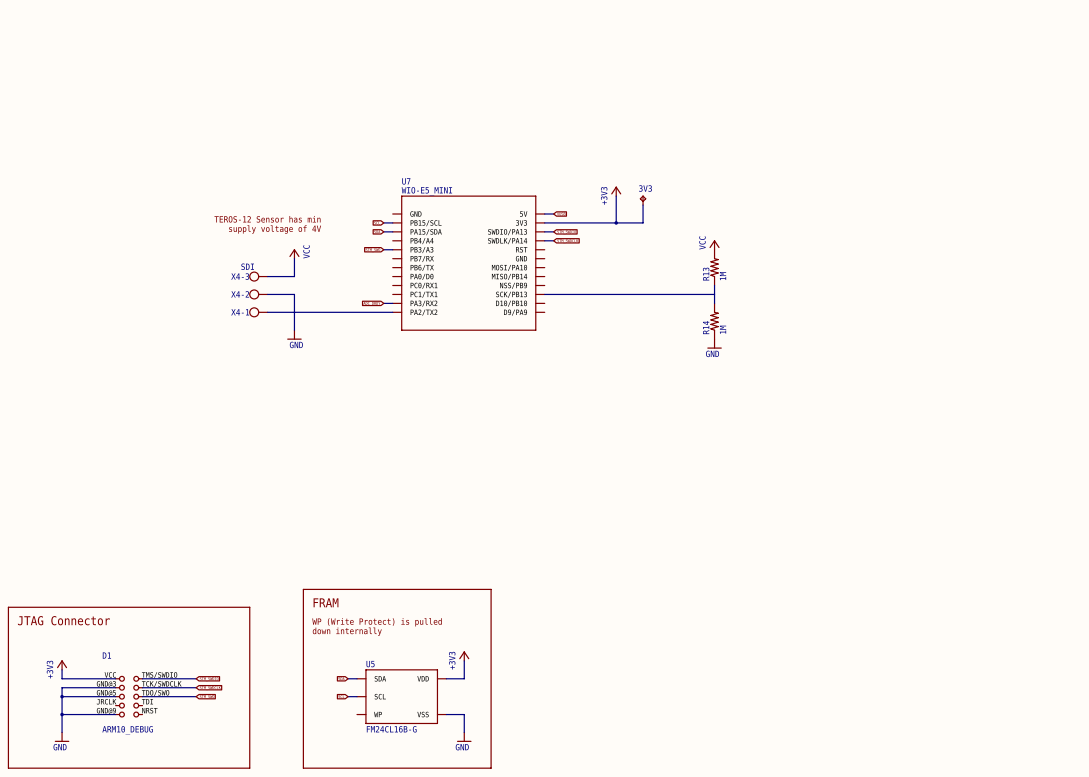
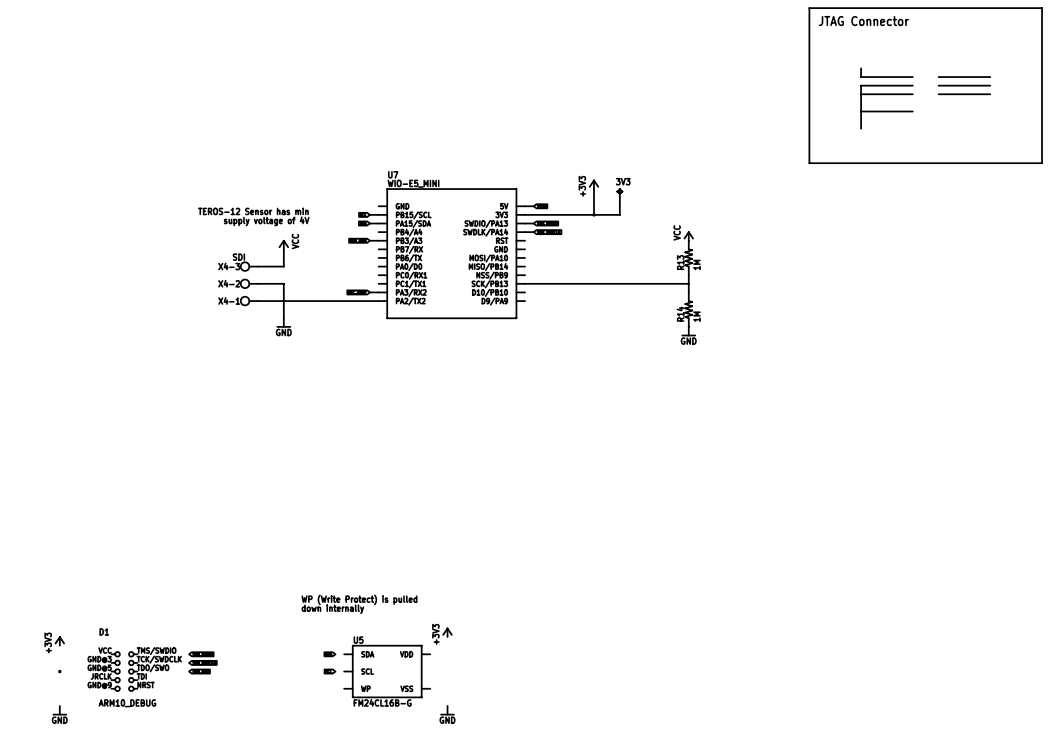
line: none -> (809, 8) (1042, 8) (1042, 163) (809, 163) (809, 8)
text: none -> JTAG Connector (863, 21)
wire: none -> (861, 68) (861, 77) (912, 77)
wire: none -> (938, 77) (990, 77)
wire: none -> (912, 85) (861, 85) (861, 128)
wire: none -> (938, 85) (990, 85)
wire: none -> (861, 94) (912, 94)
wire: none -> (938, 94) (990, 94)
wire: none -> (861, 111) (912, 111)
line: (303, 589) (303, 768) (491, 768) (491, 589) (303, 589) -> none
text: FRAM (325, 602) -> none
line: (8, 607) (249, 607) (249, 768) (8, 768) (8, 607) -> none
text: JTAG Connector (63, 620) -> none
wire: (464, 660) (464, 678) (446, 678) -> none
wire: (62, 669) (62, 678) (115, 678) -> none
wire: (142, 678) (196, 678) -> none
wire: (348, 678) (357, 678) -> none
wire: (115, 687) (62, 687) (62, 732) -> none
wire: (142, 687) (196, 687) -> none
wire: (62, 696) (115, 696) -> none
wire: (142, 696) (196, 696) -> none
wire: (348, 696) (357, 696) -> none
wire: (62, 714) (115, 714) -> none
junction: (62, 714) -> none
wire: (446, 714) (464, 714) (464, 732) -> none

